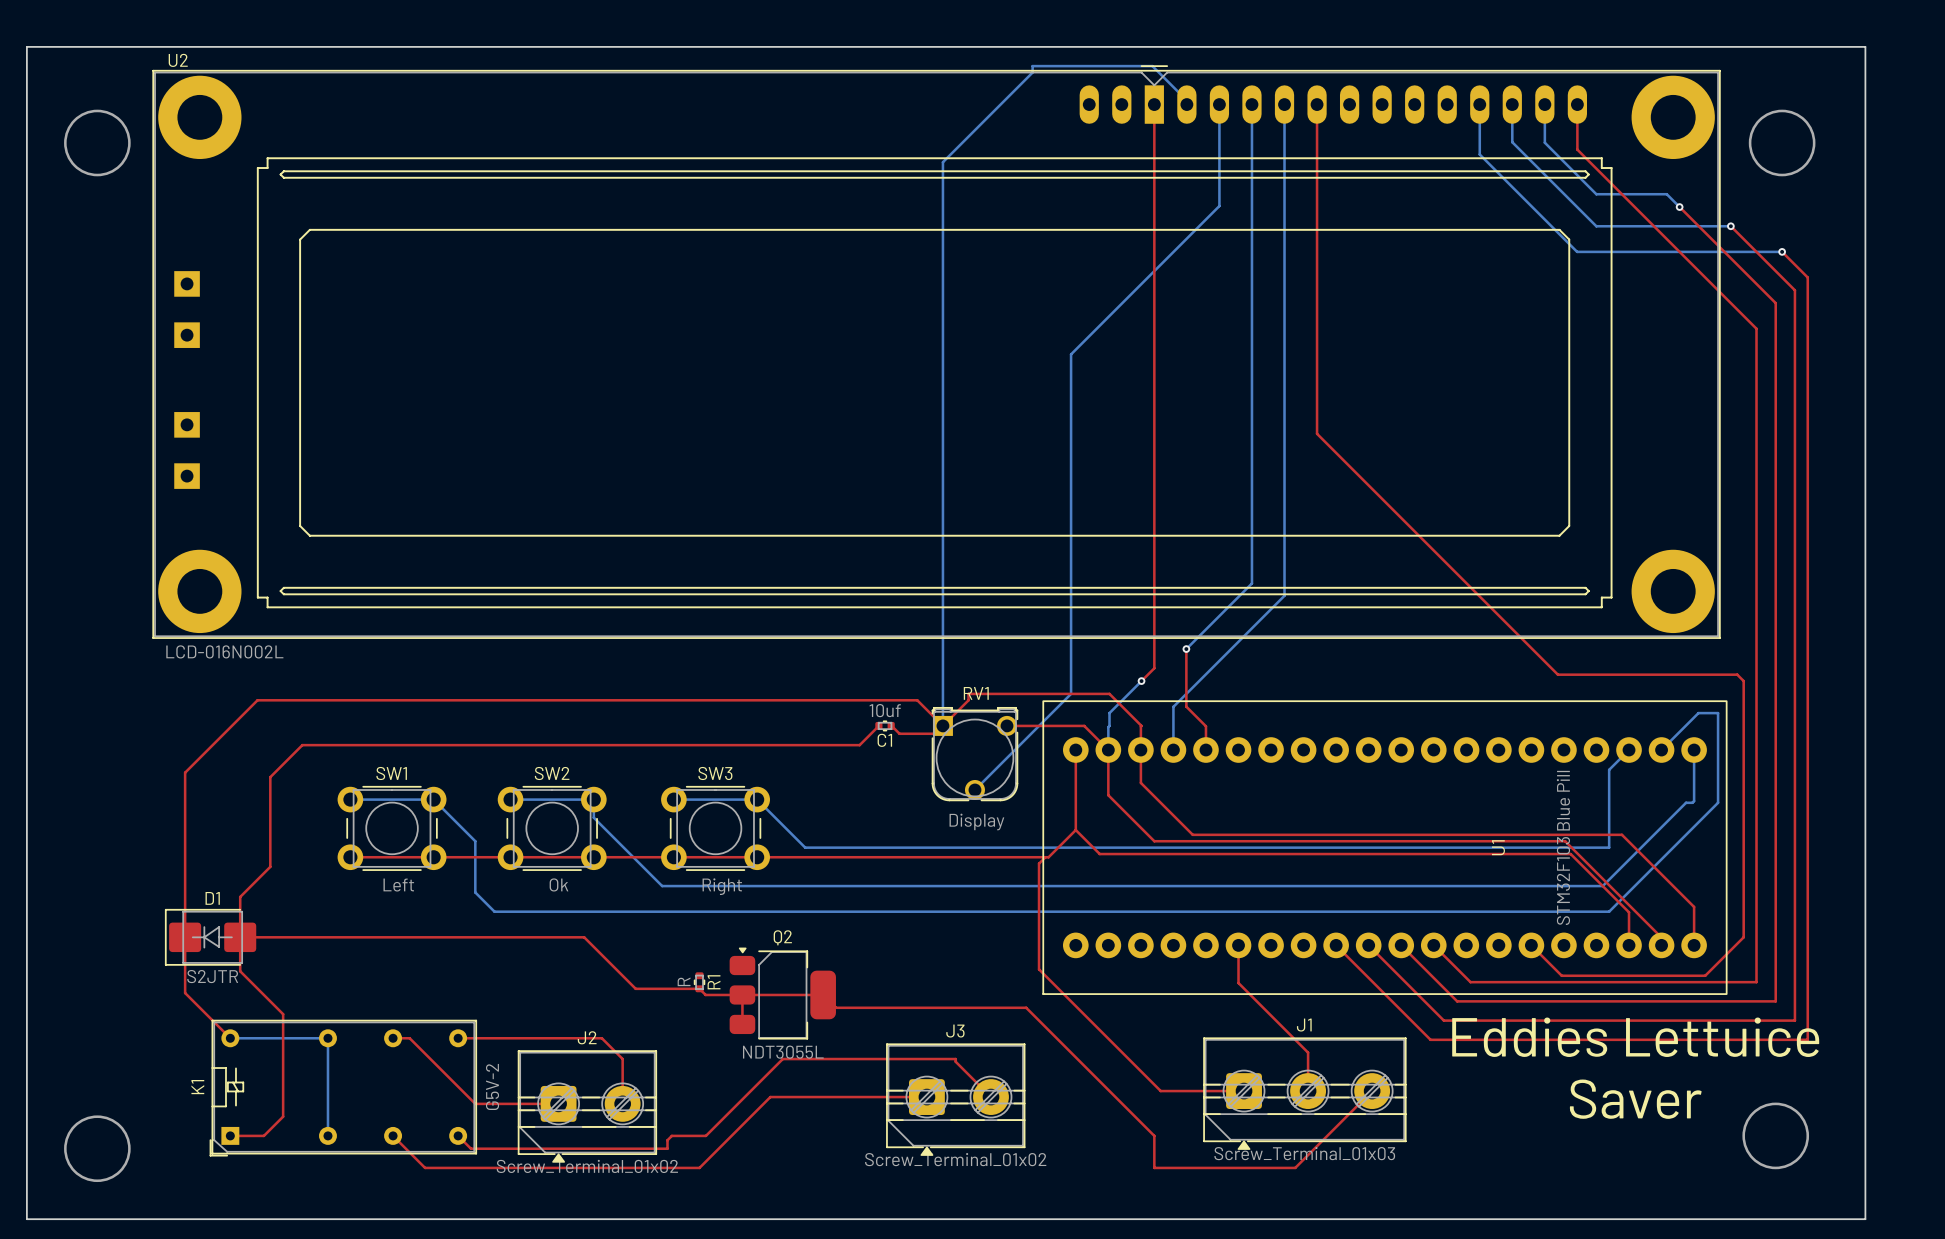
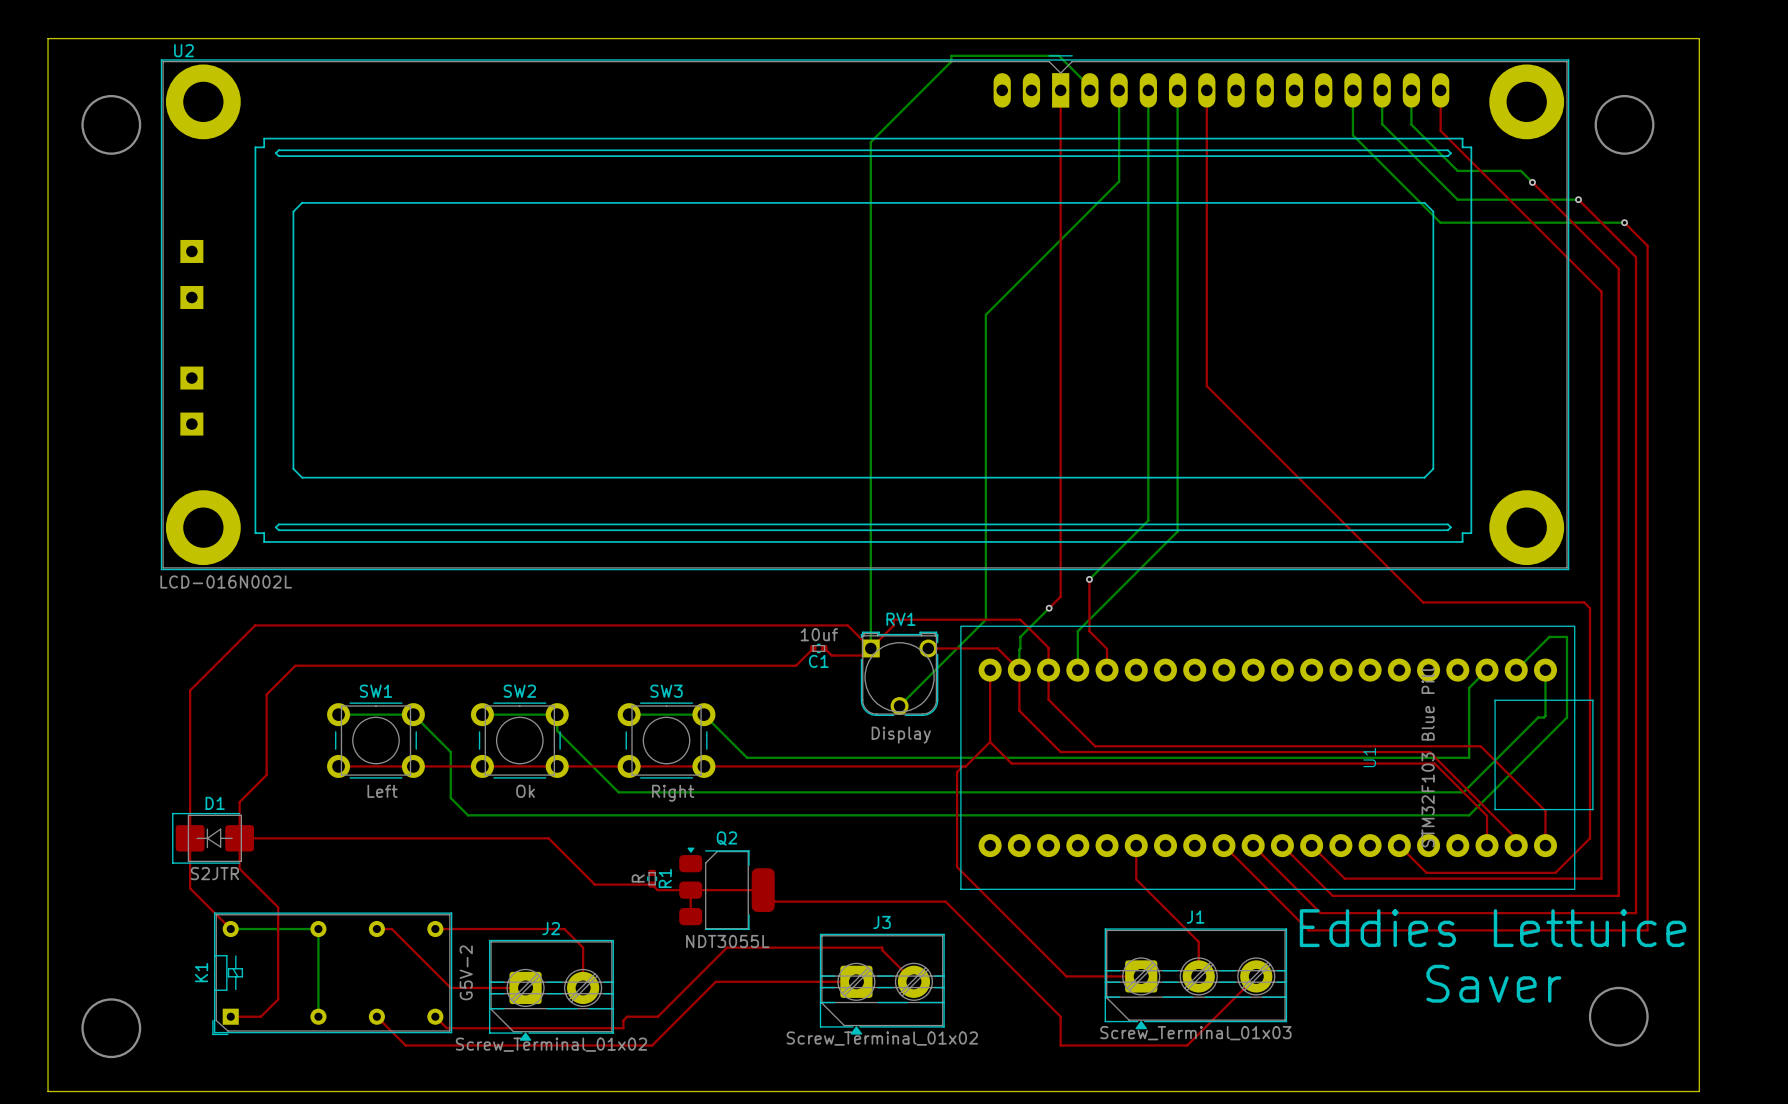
line: none -> (1495, 700) (1592, 700) (1592, 809) (1495, 809) (1495, 700)

